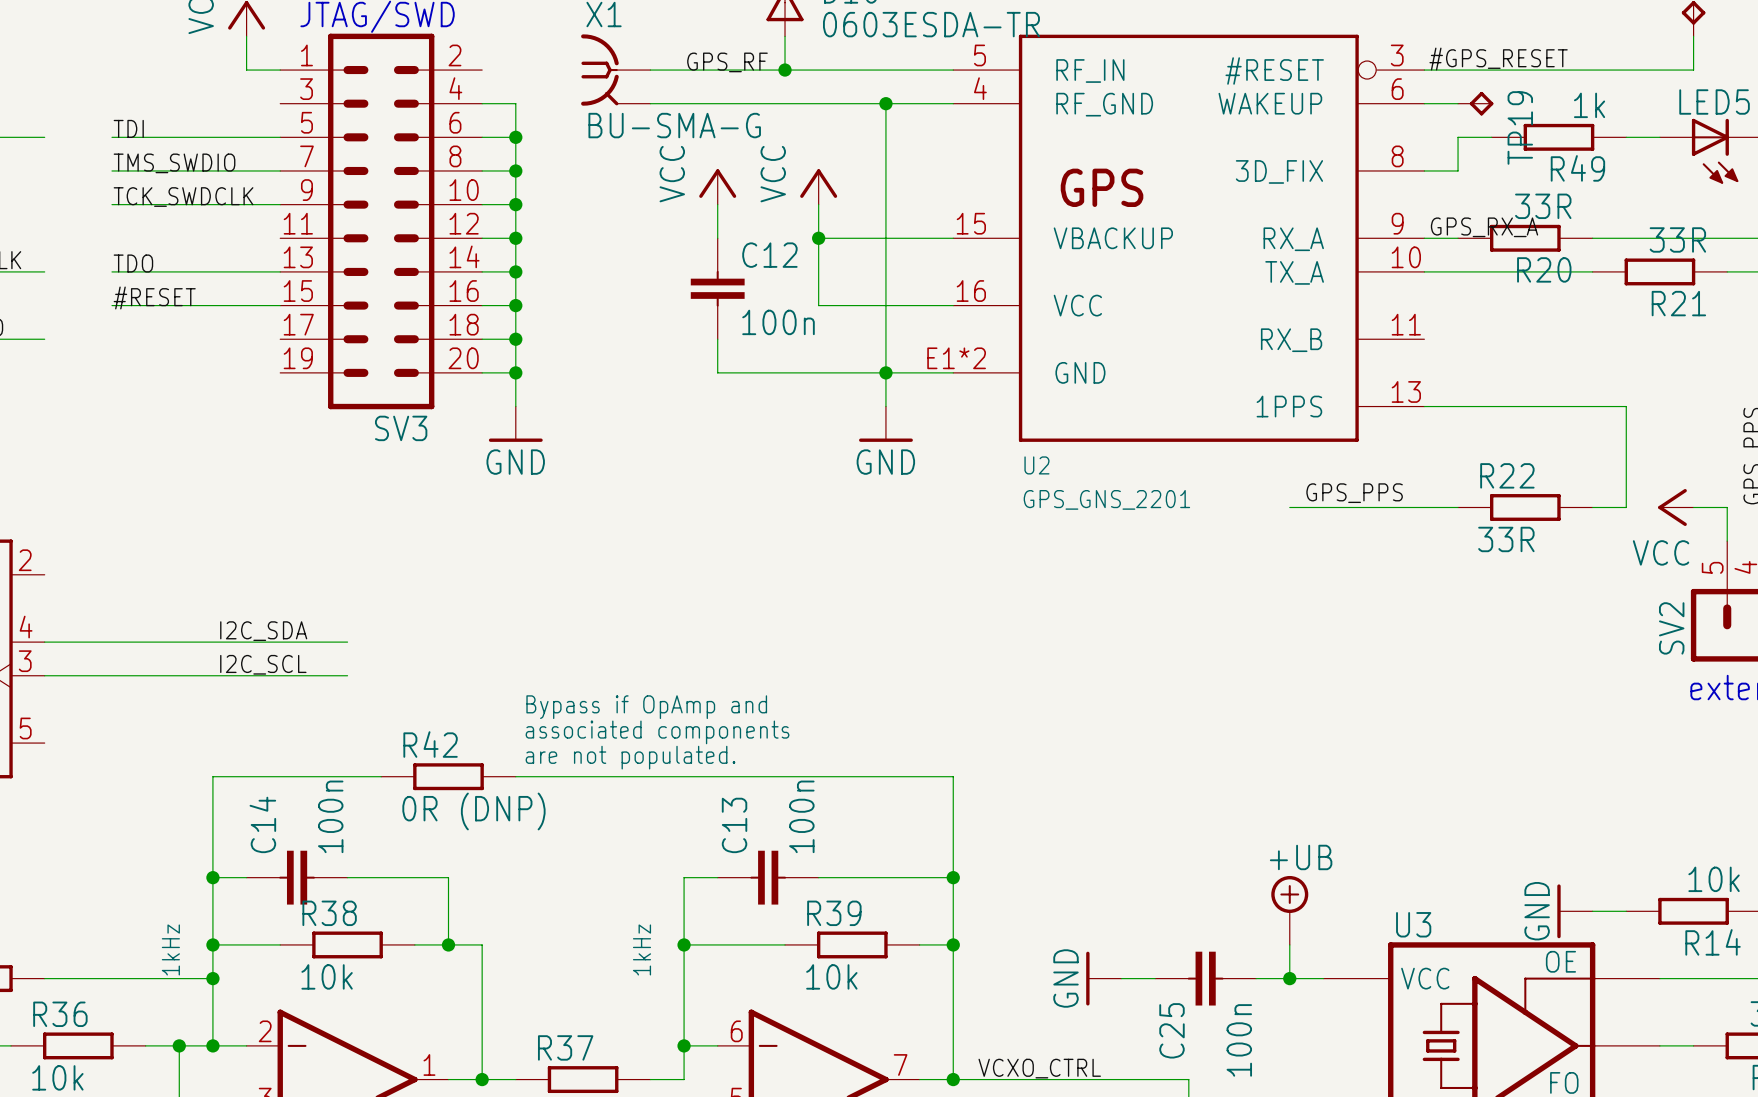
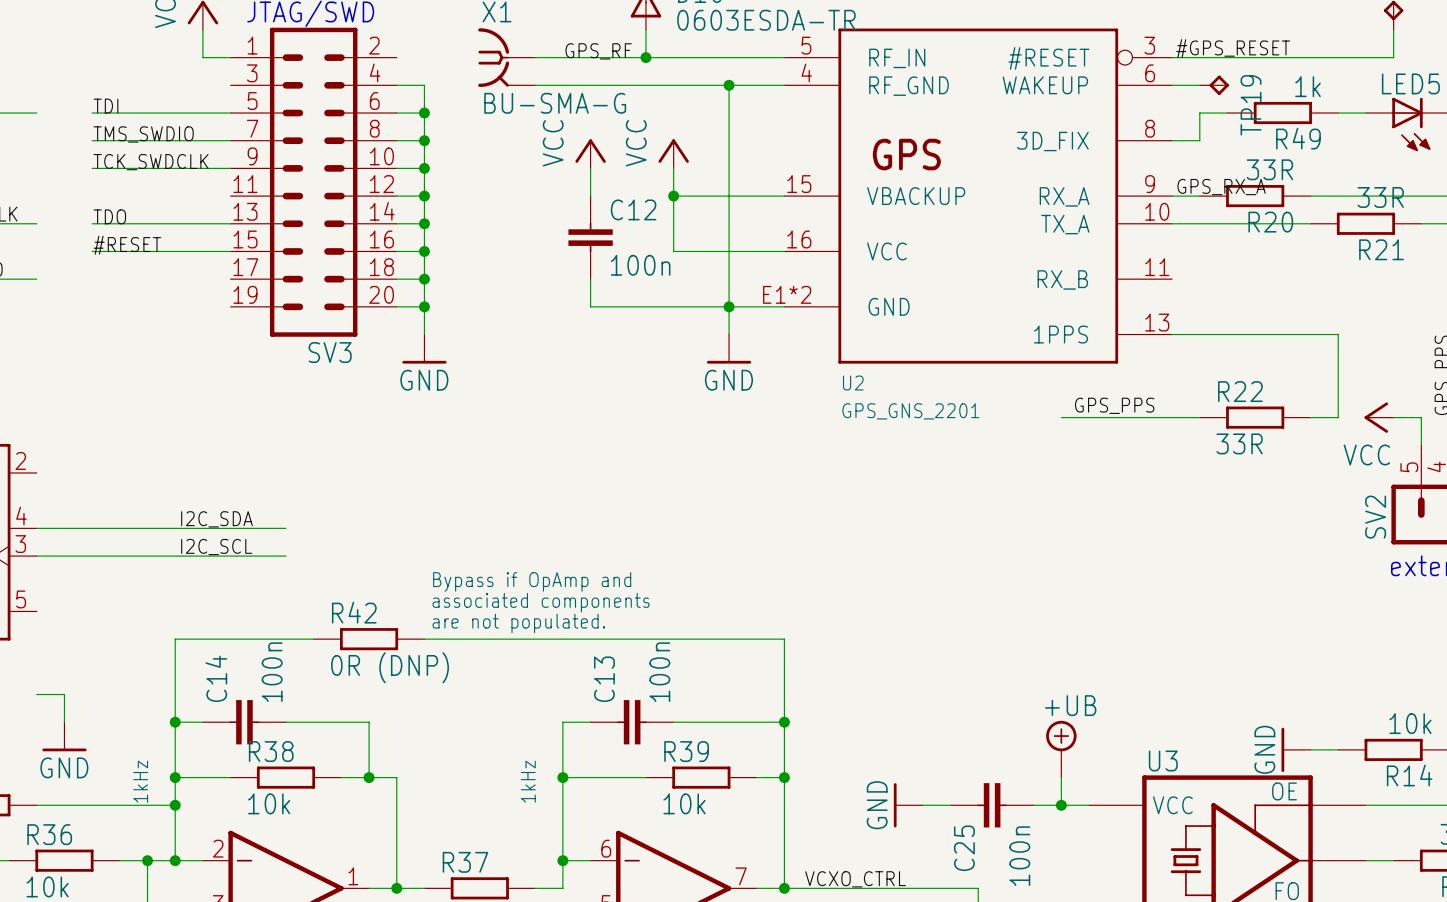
wire: none -> (36, 694) (64, 694) (64, 722)
power symbol: none -> GND (64, 736)

